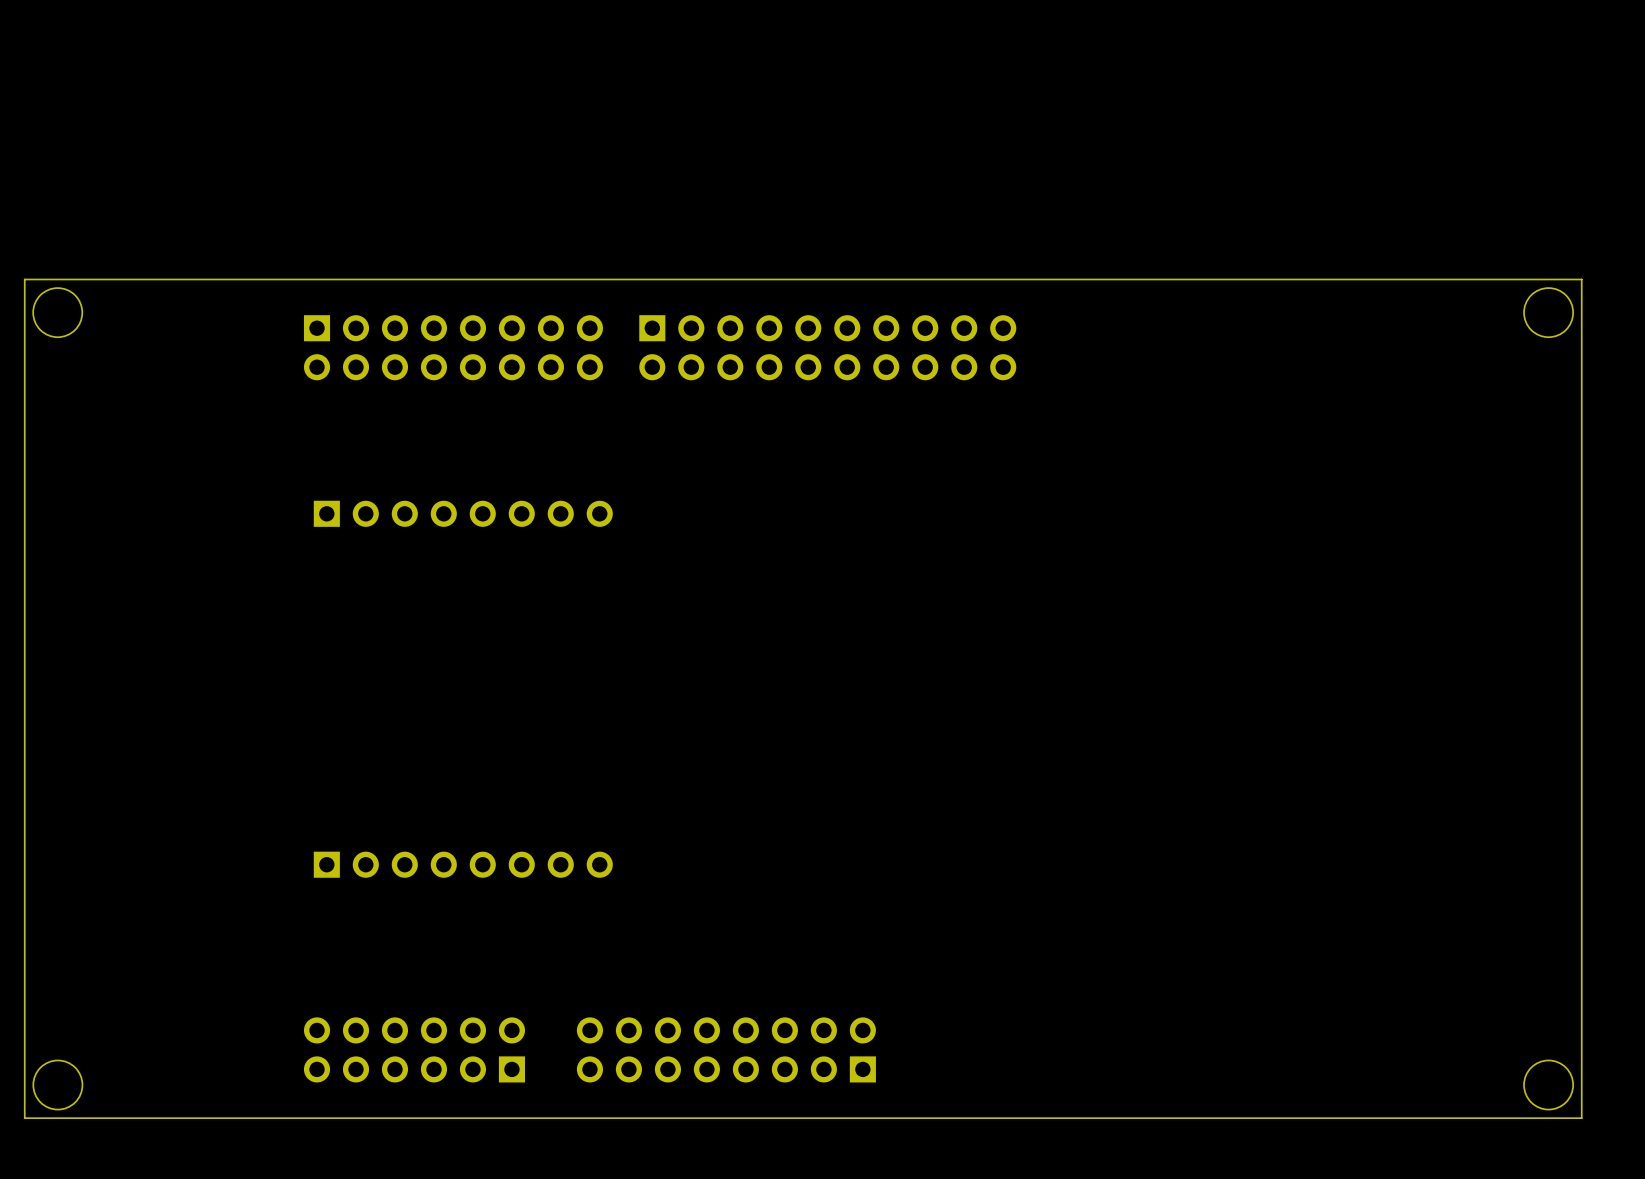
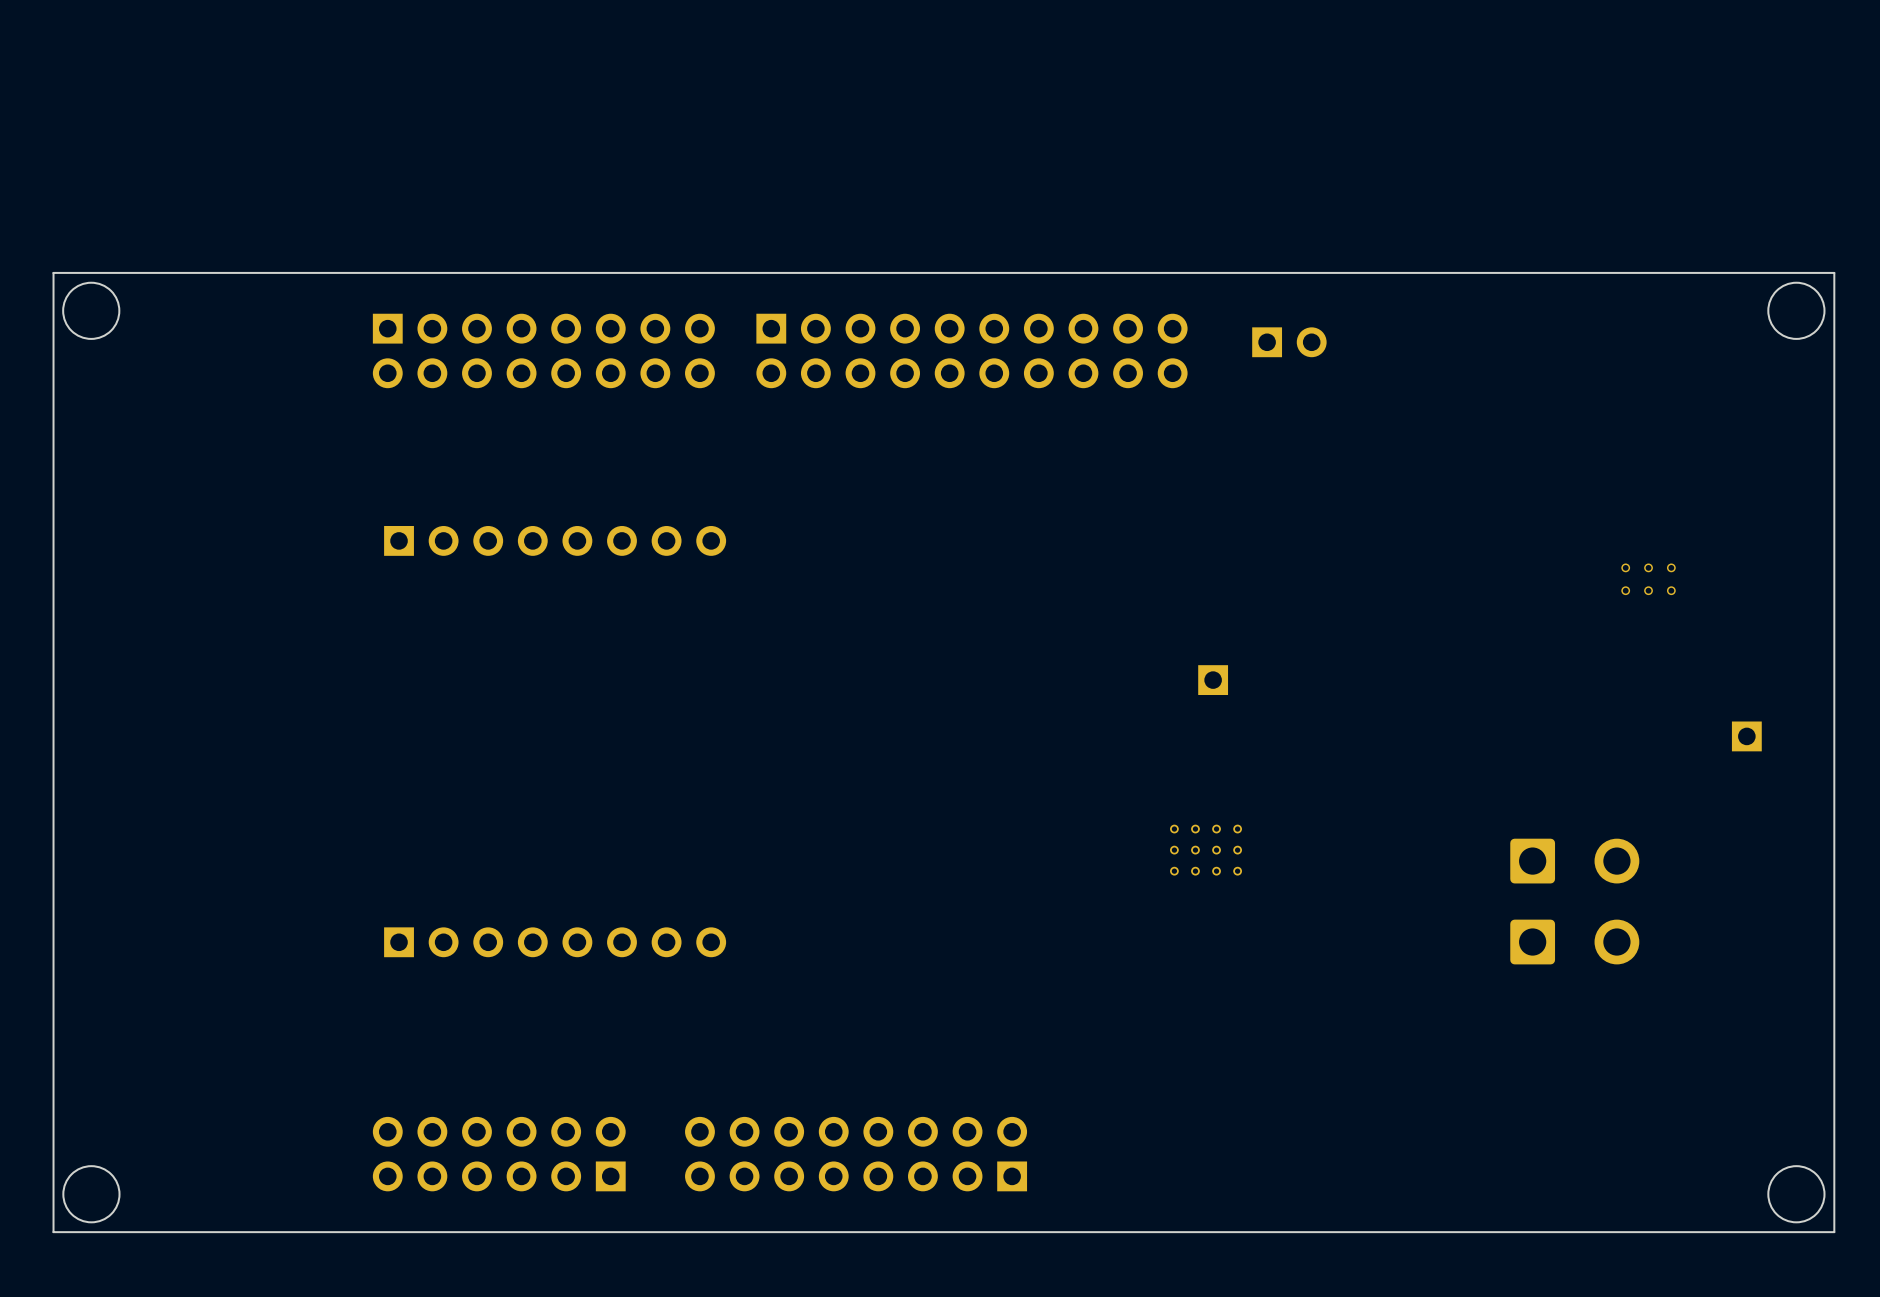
part: none -> (1289, 342)
part: none -> (1648, 579)
part: none -> (1213, 680)
part: none -> (1746, 736)
part: none -> (1206, 850)
part: none -> (1574, 861)
part: none -> (1574, 942)

